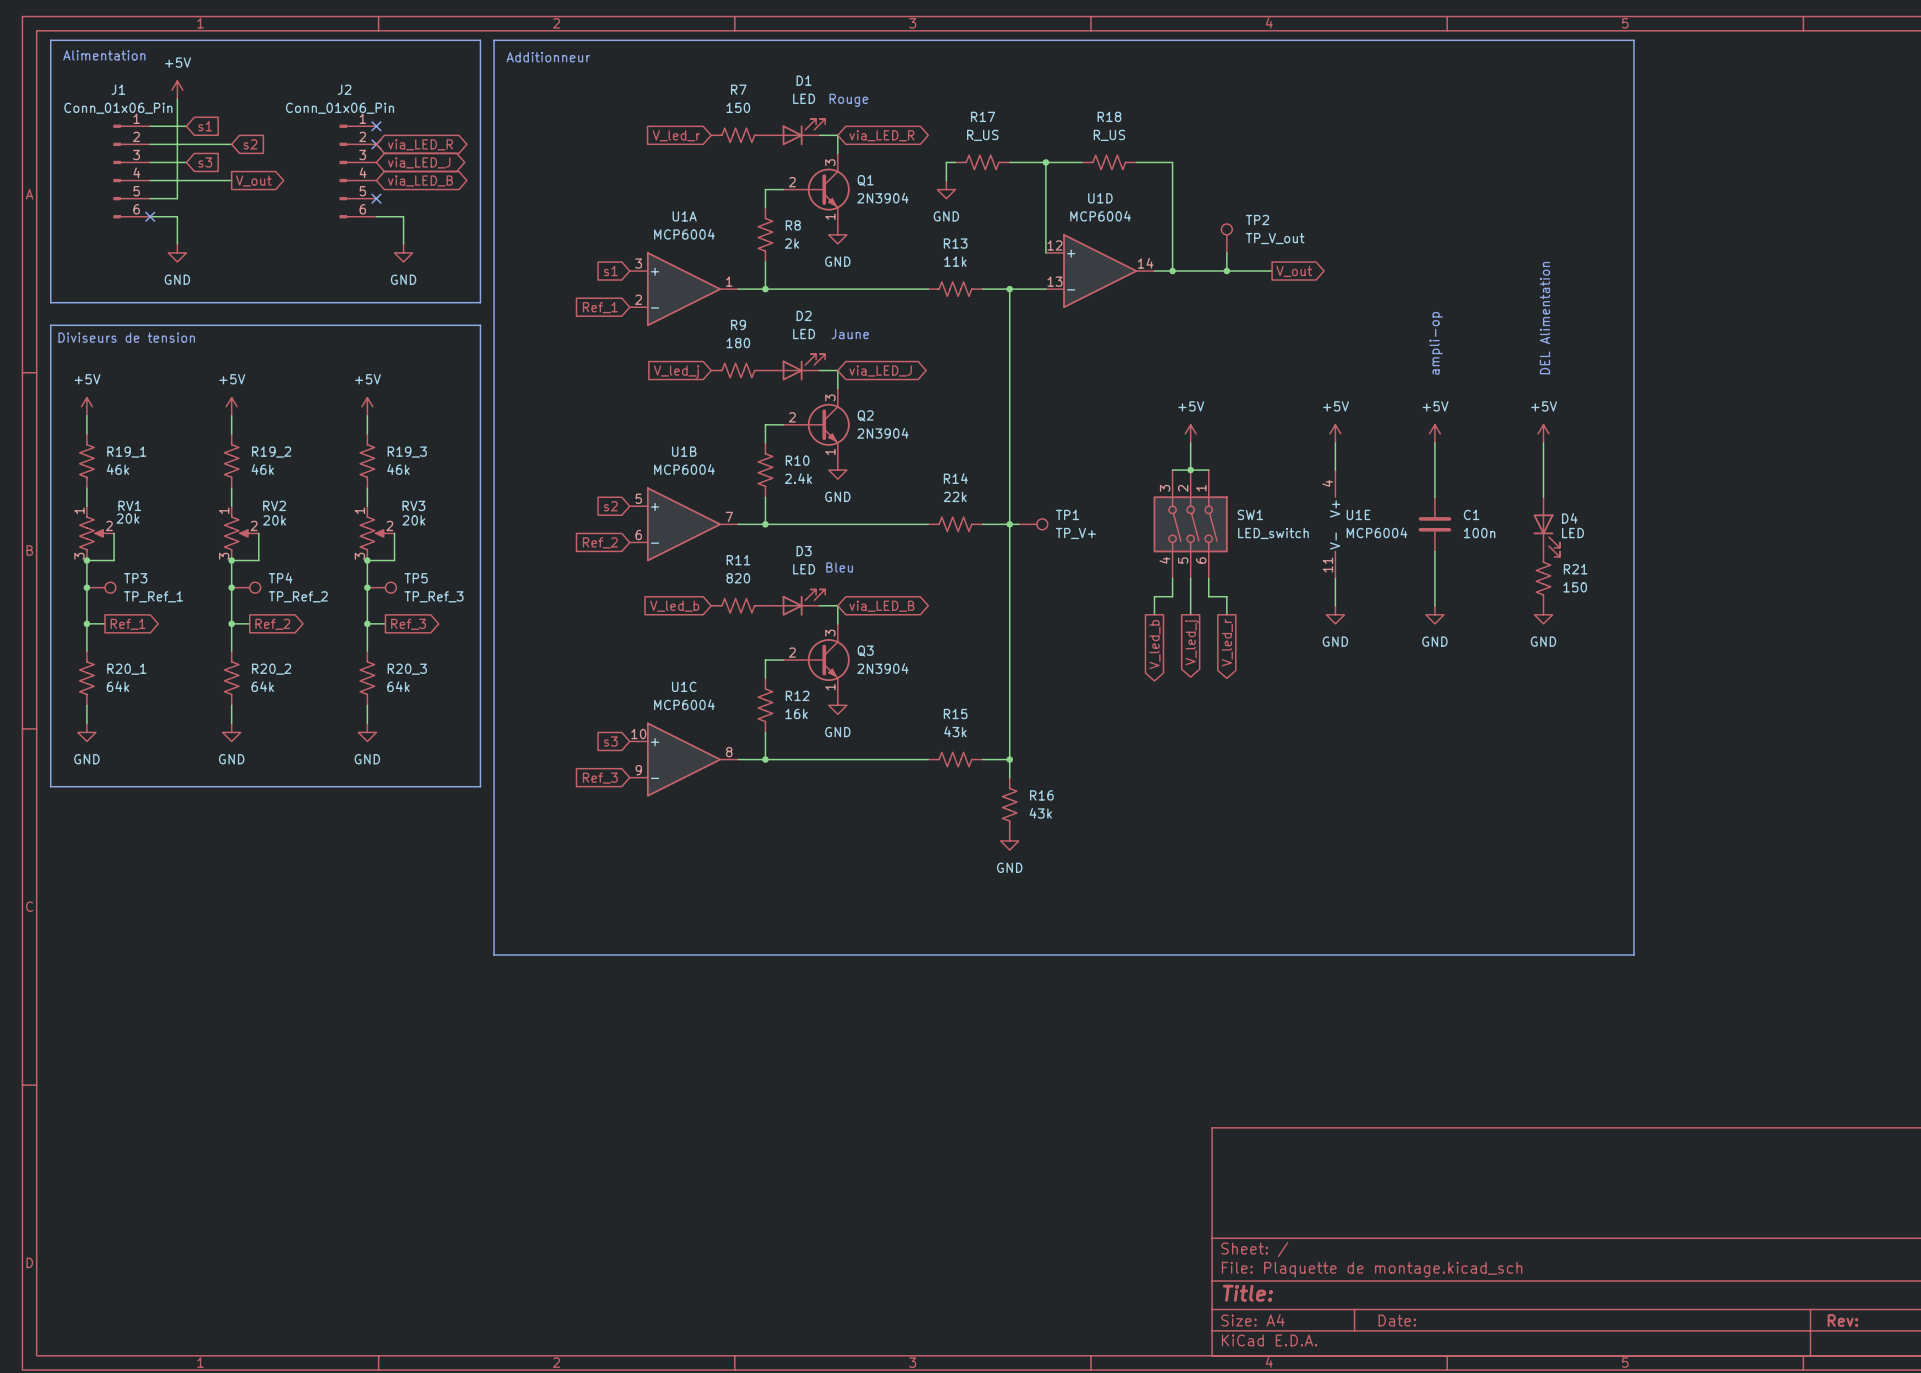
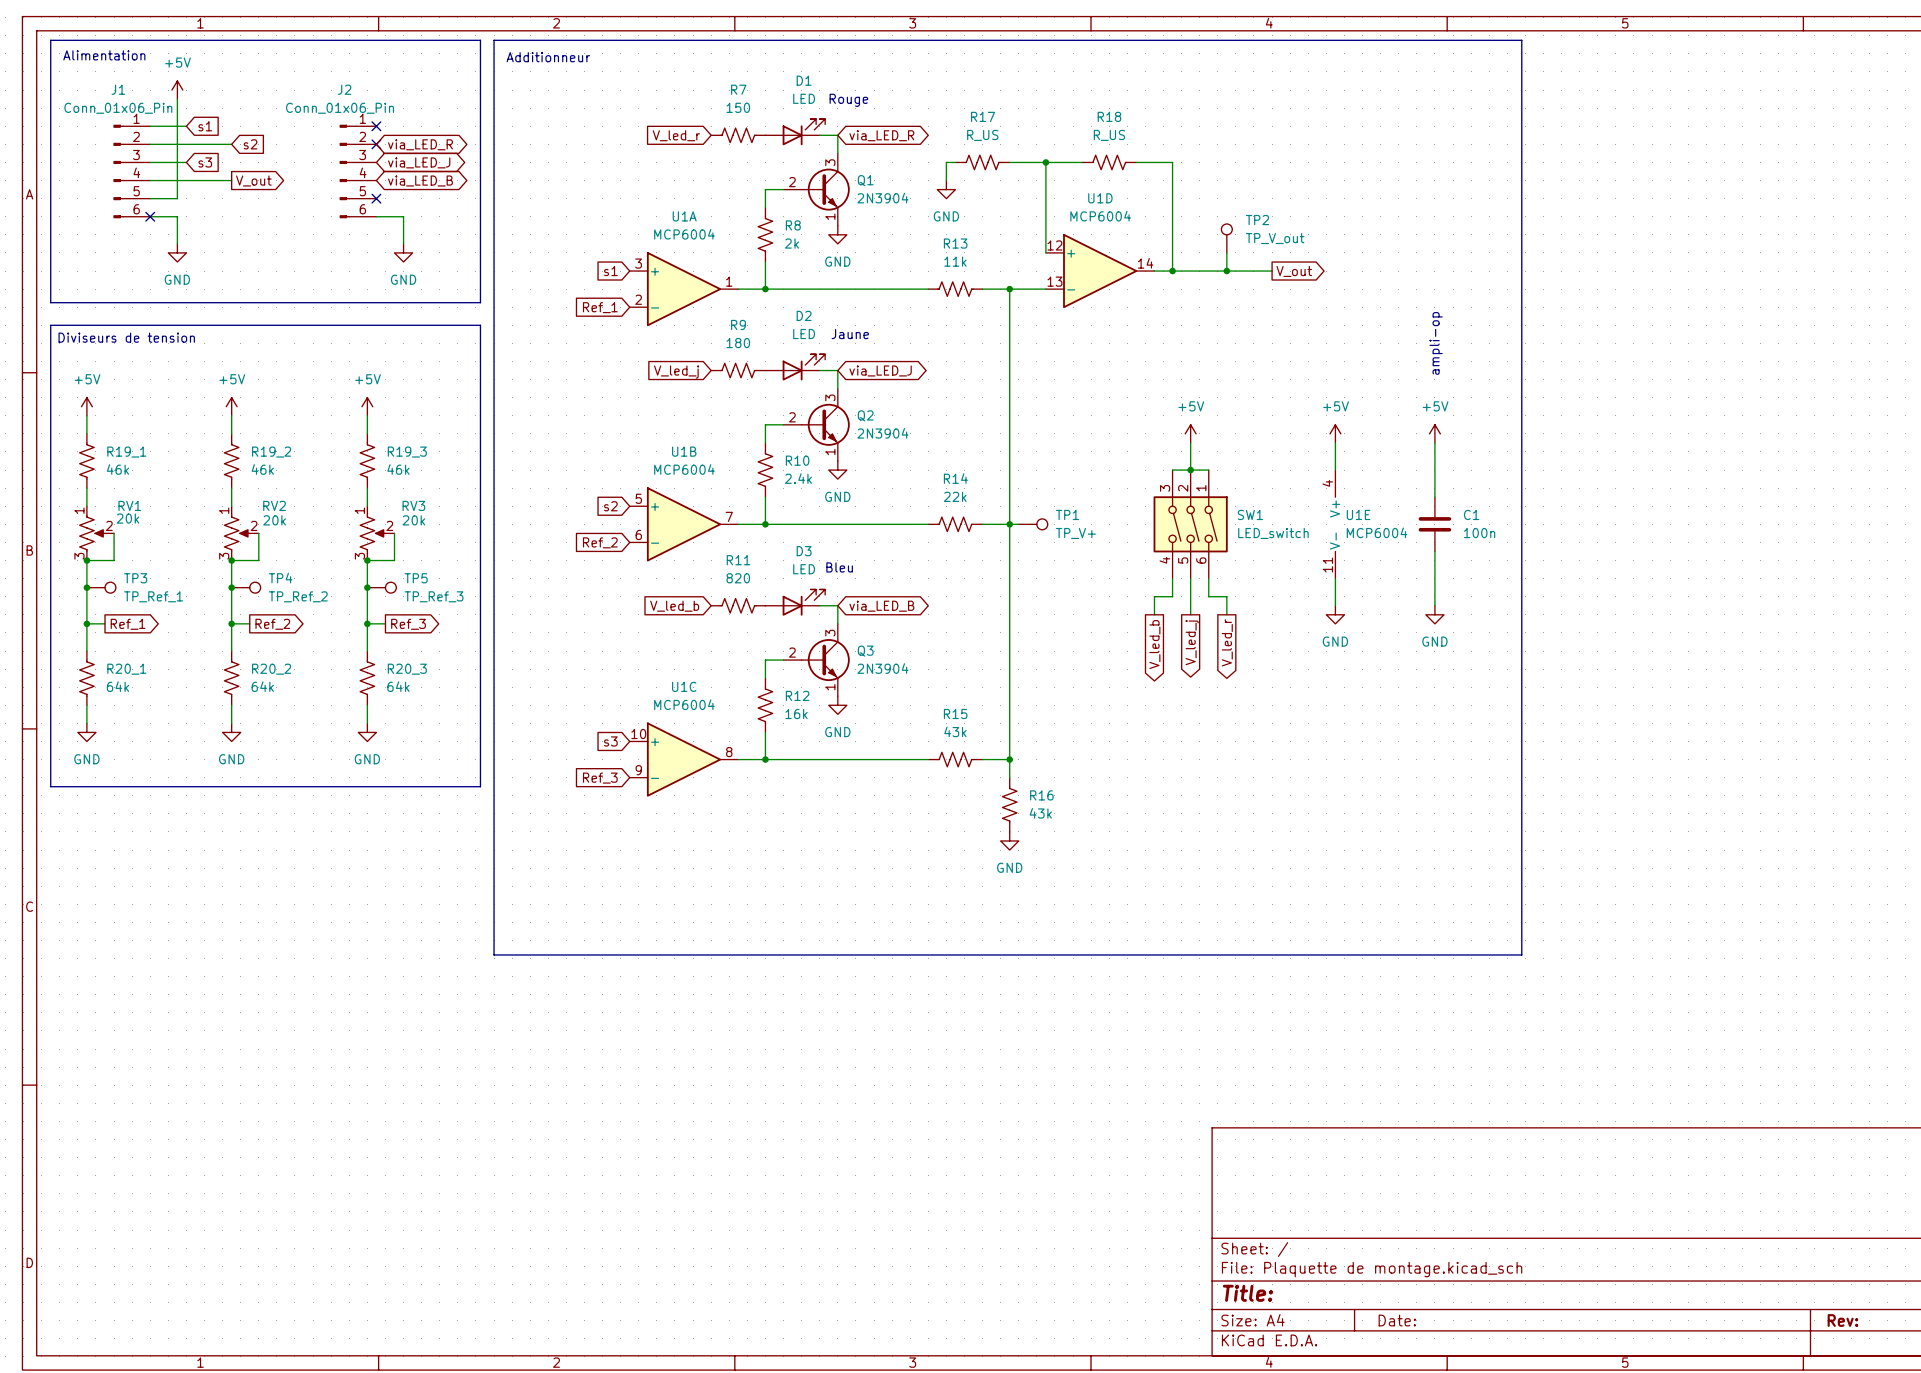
line: (1521, 40) (1633, 40) (1633, 954) (1521, 954) -> (1521, 40) (1521, 954)
text: DEL Alimentation (1544, 318) -> none
power symbol: +5V (1543, 433) -> none
wire: (1543, 442) (1543, 497) -> none
D4: LED (1546, 527) -> none
R21: 150 (1543, 578) -> none
power symbol: GND (1543, 614) -> none

